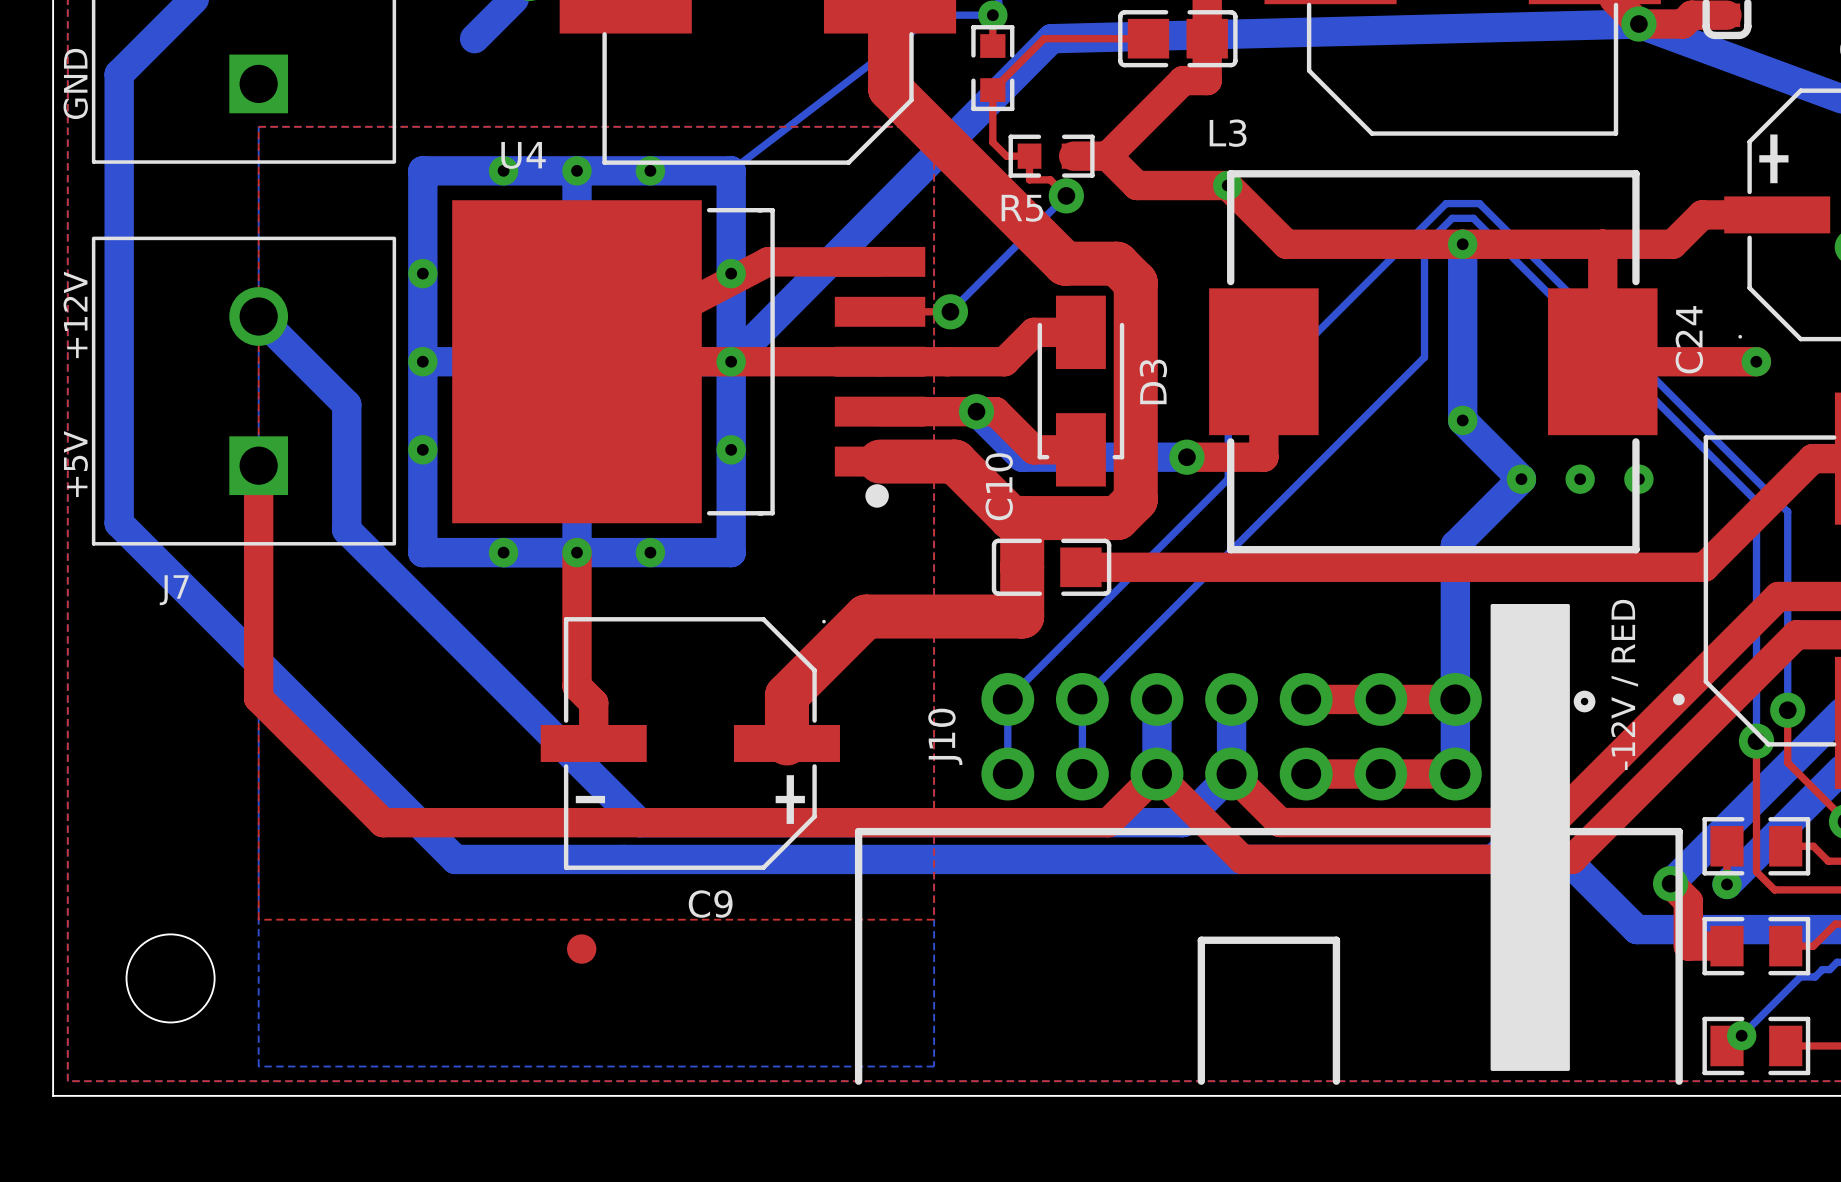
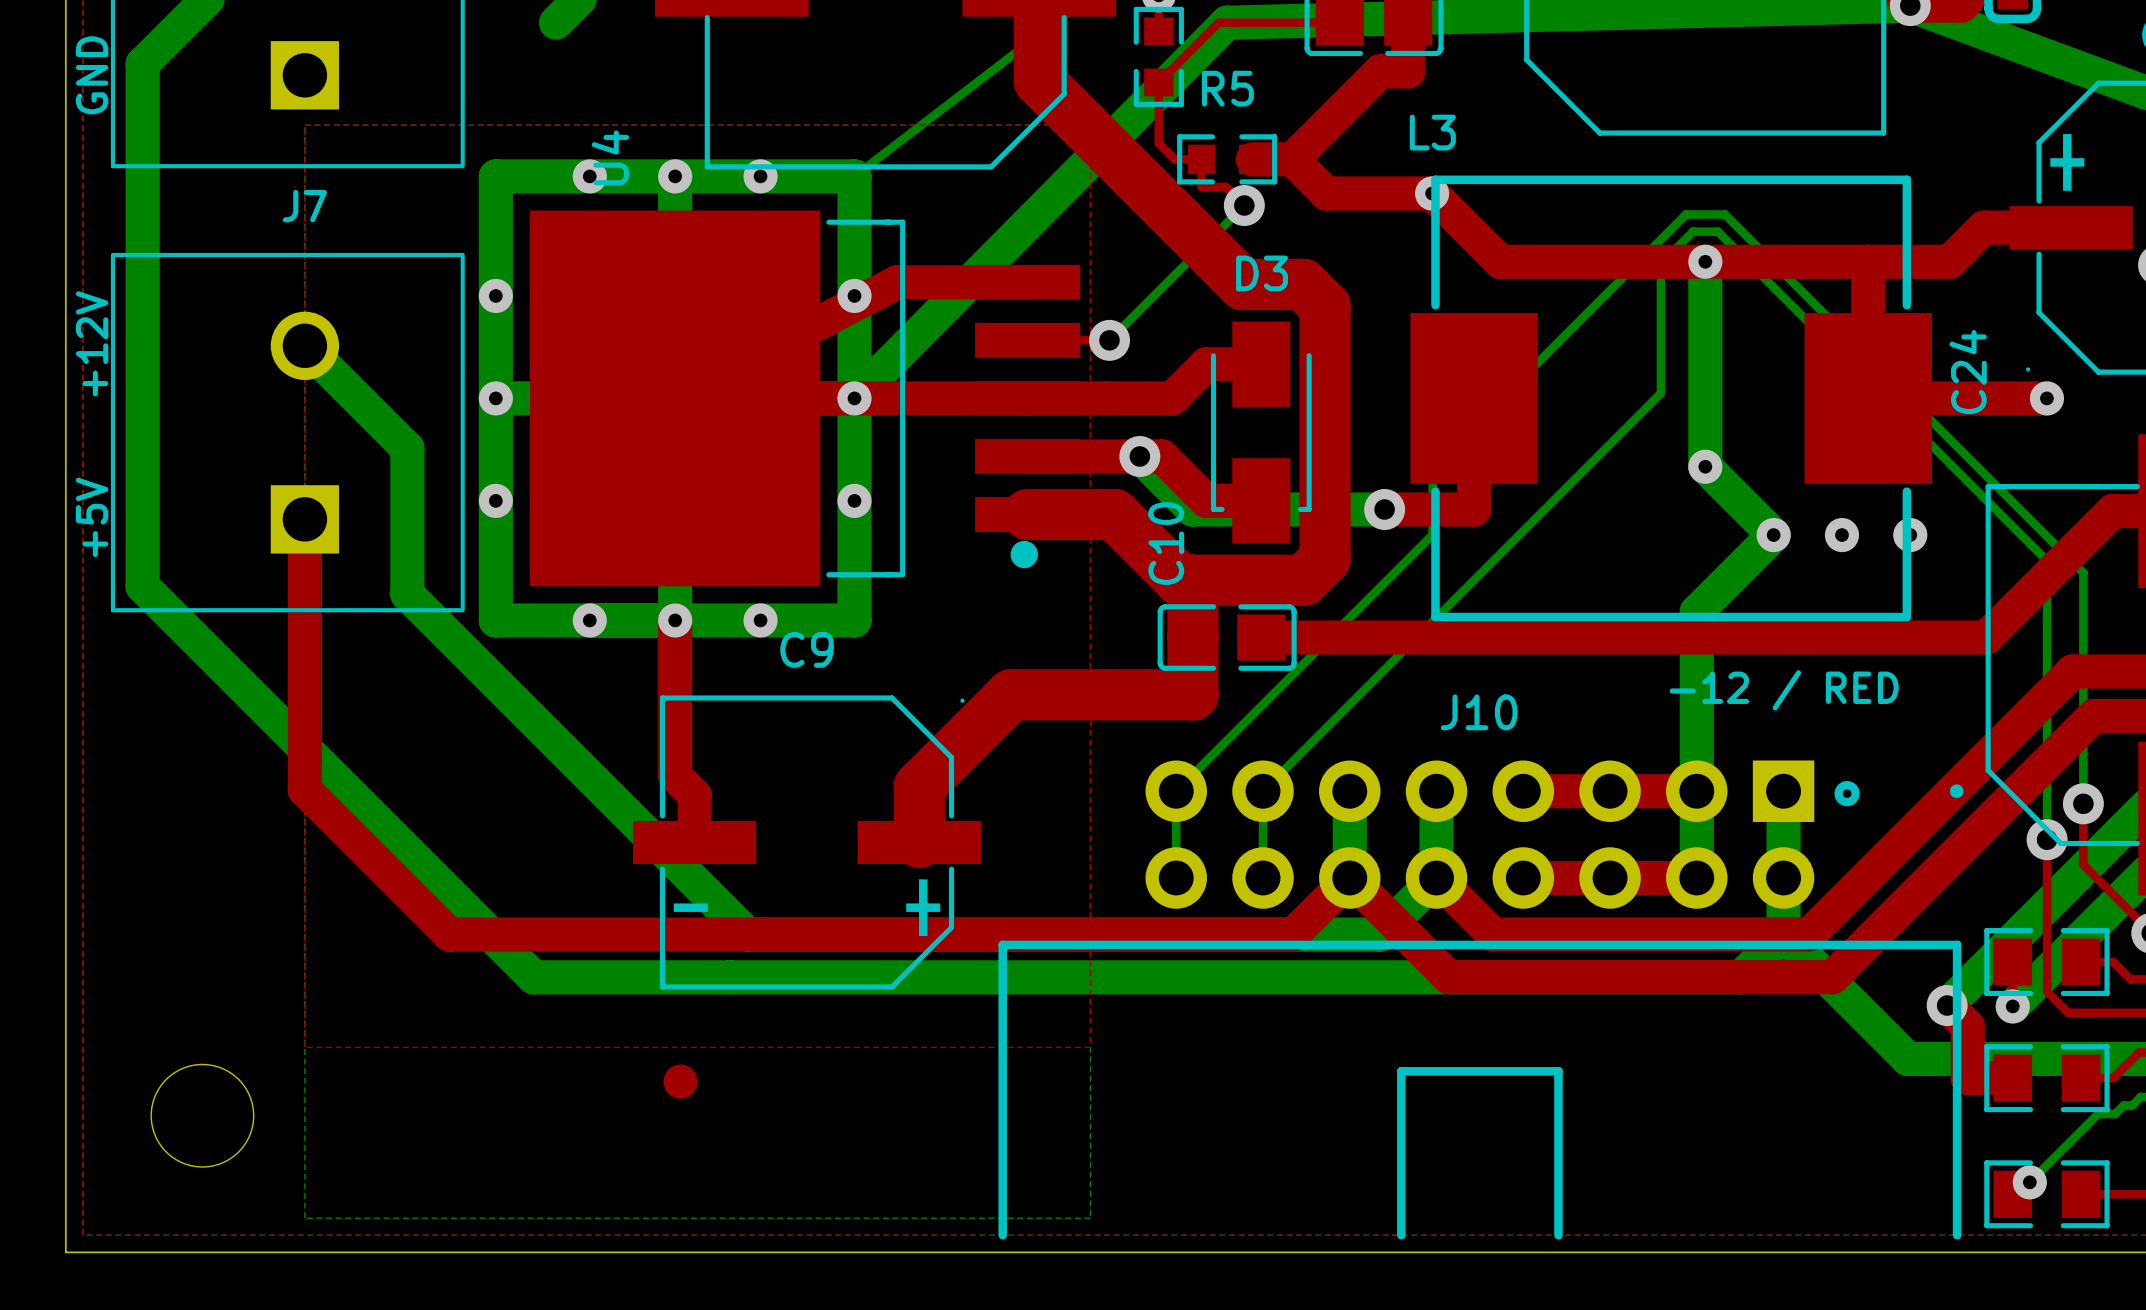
U4 name rotation: 0° (523, 155) -> 90° counterclockwise (610, 157)
R5 name position: R5 (1022, 208) -> R5 (1227, 88)
D3 name rotation: 0° (1153, 381) -> 90° clockwise (1262, 273)
D3 name position: D3 (1153, 381) -> D3 (1262, 273)
J7 name position: J7 (174, 590) -> J7 (304, 206)
drawing: [1490, 604, 1570, 1071] -> none
text: -12V / RED (1624, 684) -> -12 / RED (1784, 690)
J10 name rotation: 0° (945, 736) -> 90° clockwise (1479, 712)
J10 name position: J10 (945, 736) -> J10 (1479, 712)
C9 name position: C9 (710, 904) -> C9 (807, 649)

